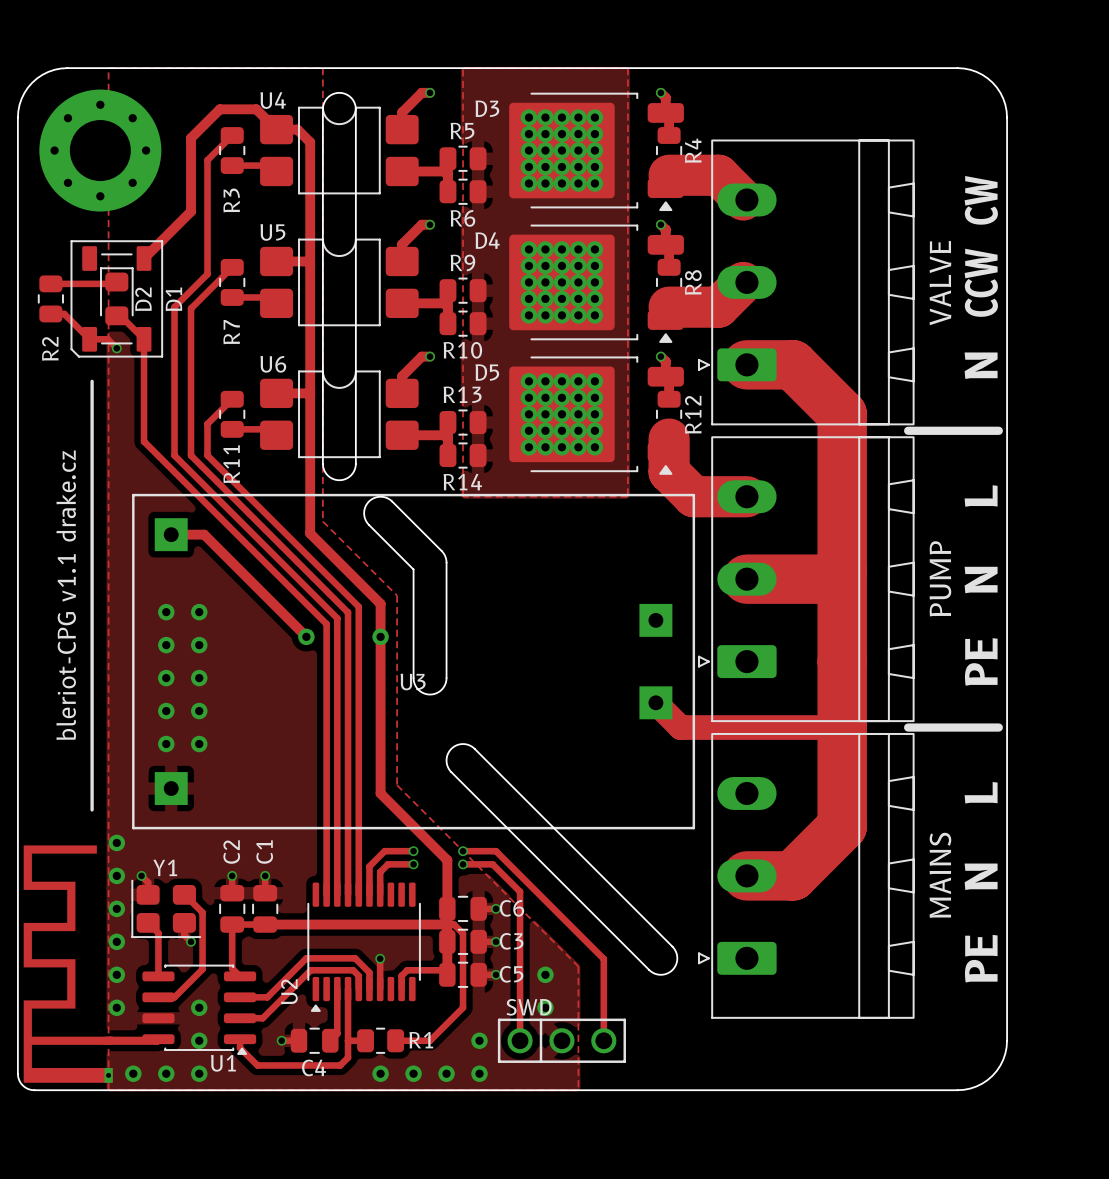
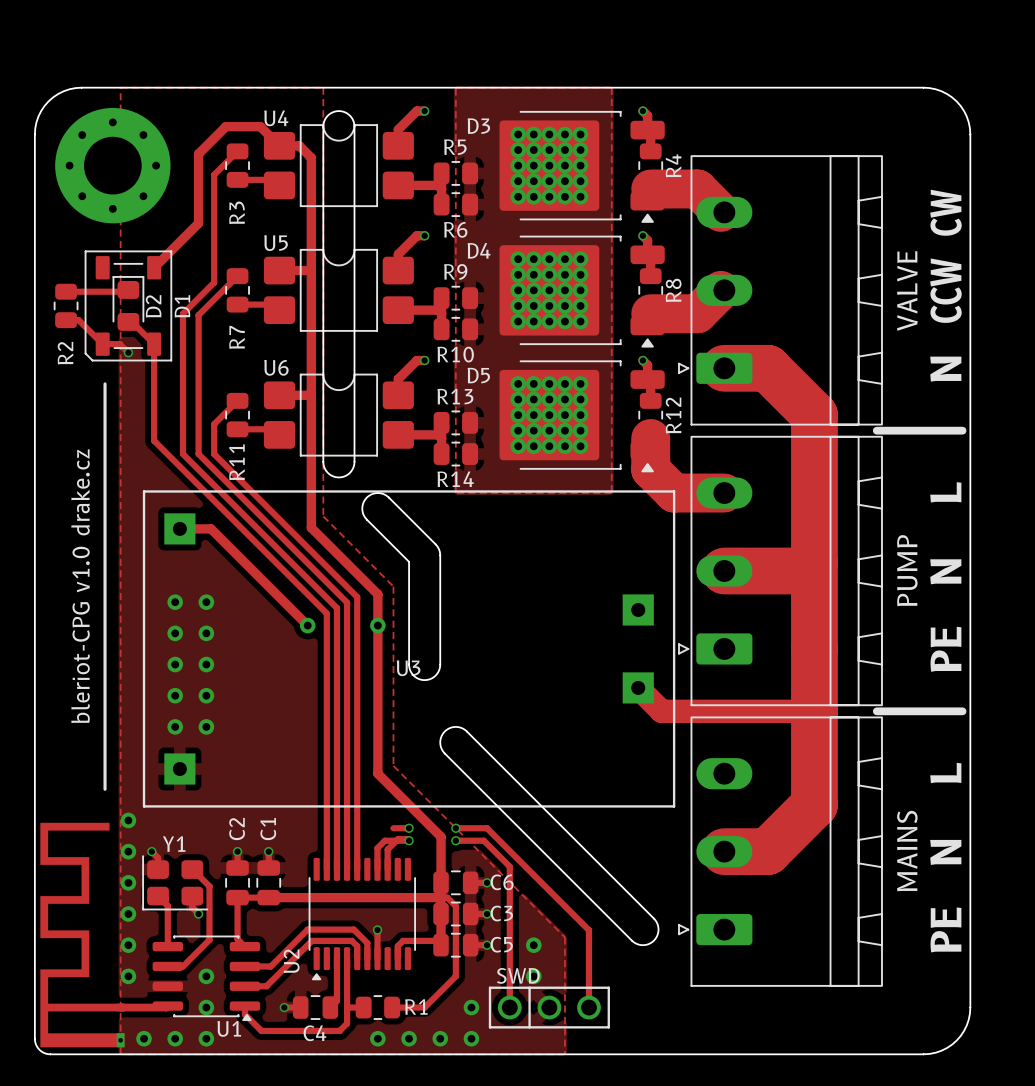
text: bleriot-CPG v1.1 drake.cz (66, 595) -> bleriot-CPG v1.0 drake.cz (80, 586)
track: (397, 851) (384, 851) (369, 866) (369, 894) -> none
track: none -> (409, 840) (398, 839) (387, 849) (387, 869)

